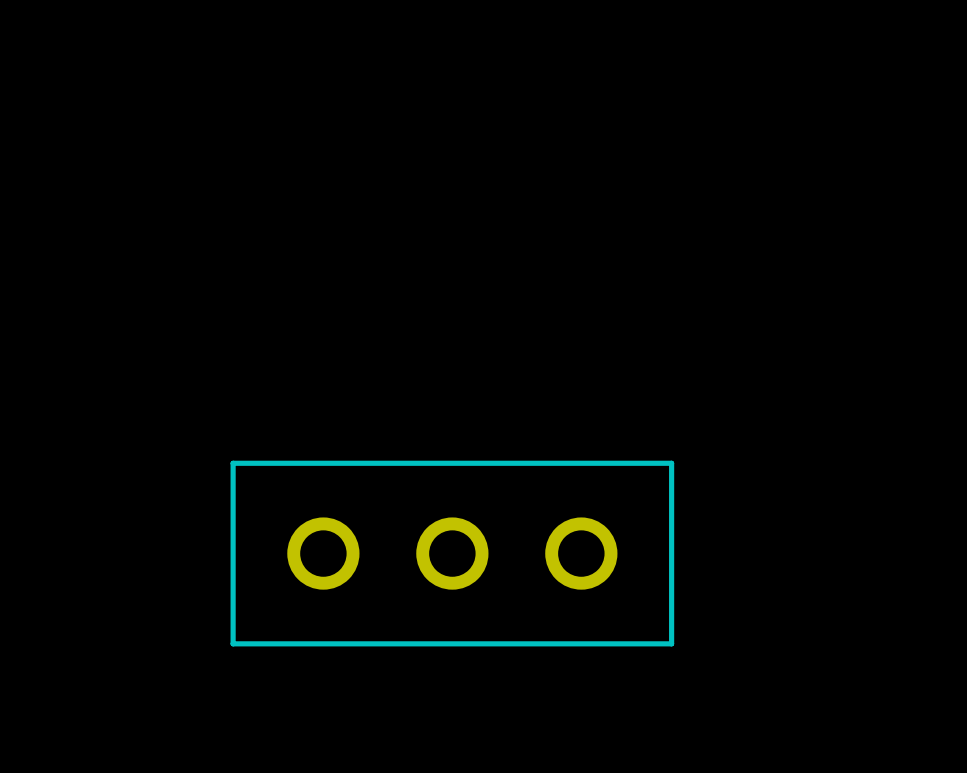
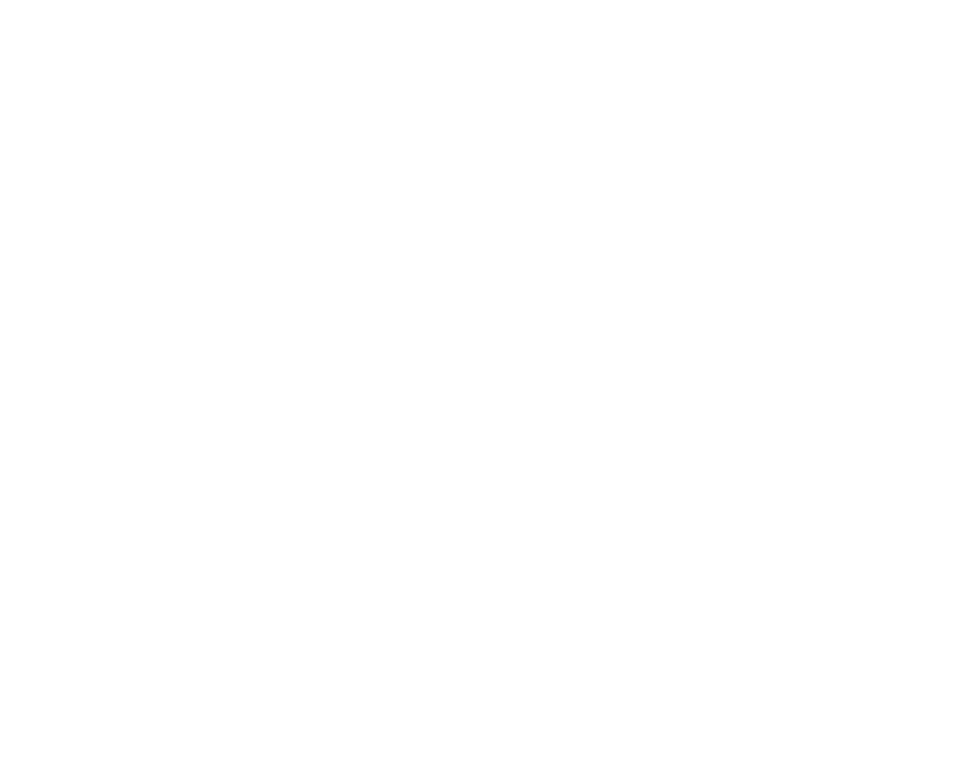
part: (452, 553) -> none

